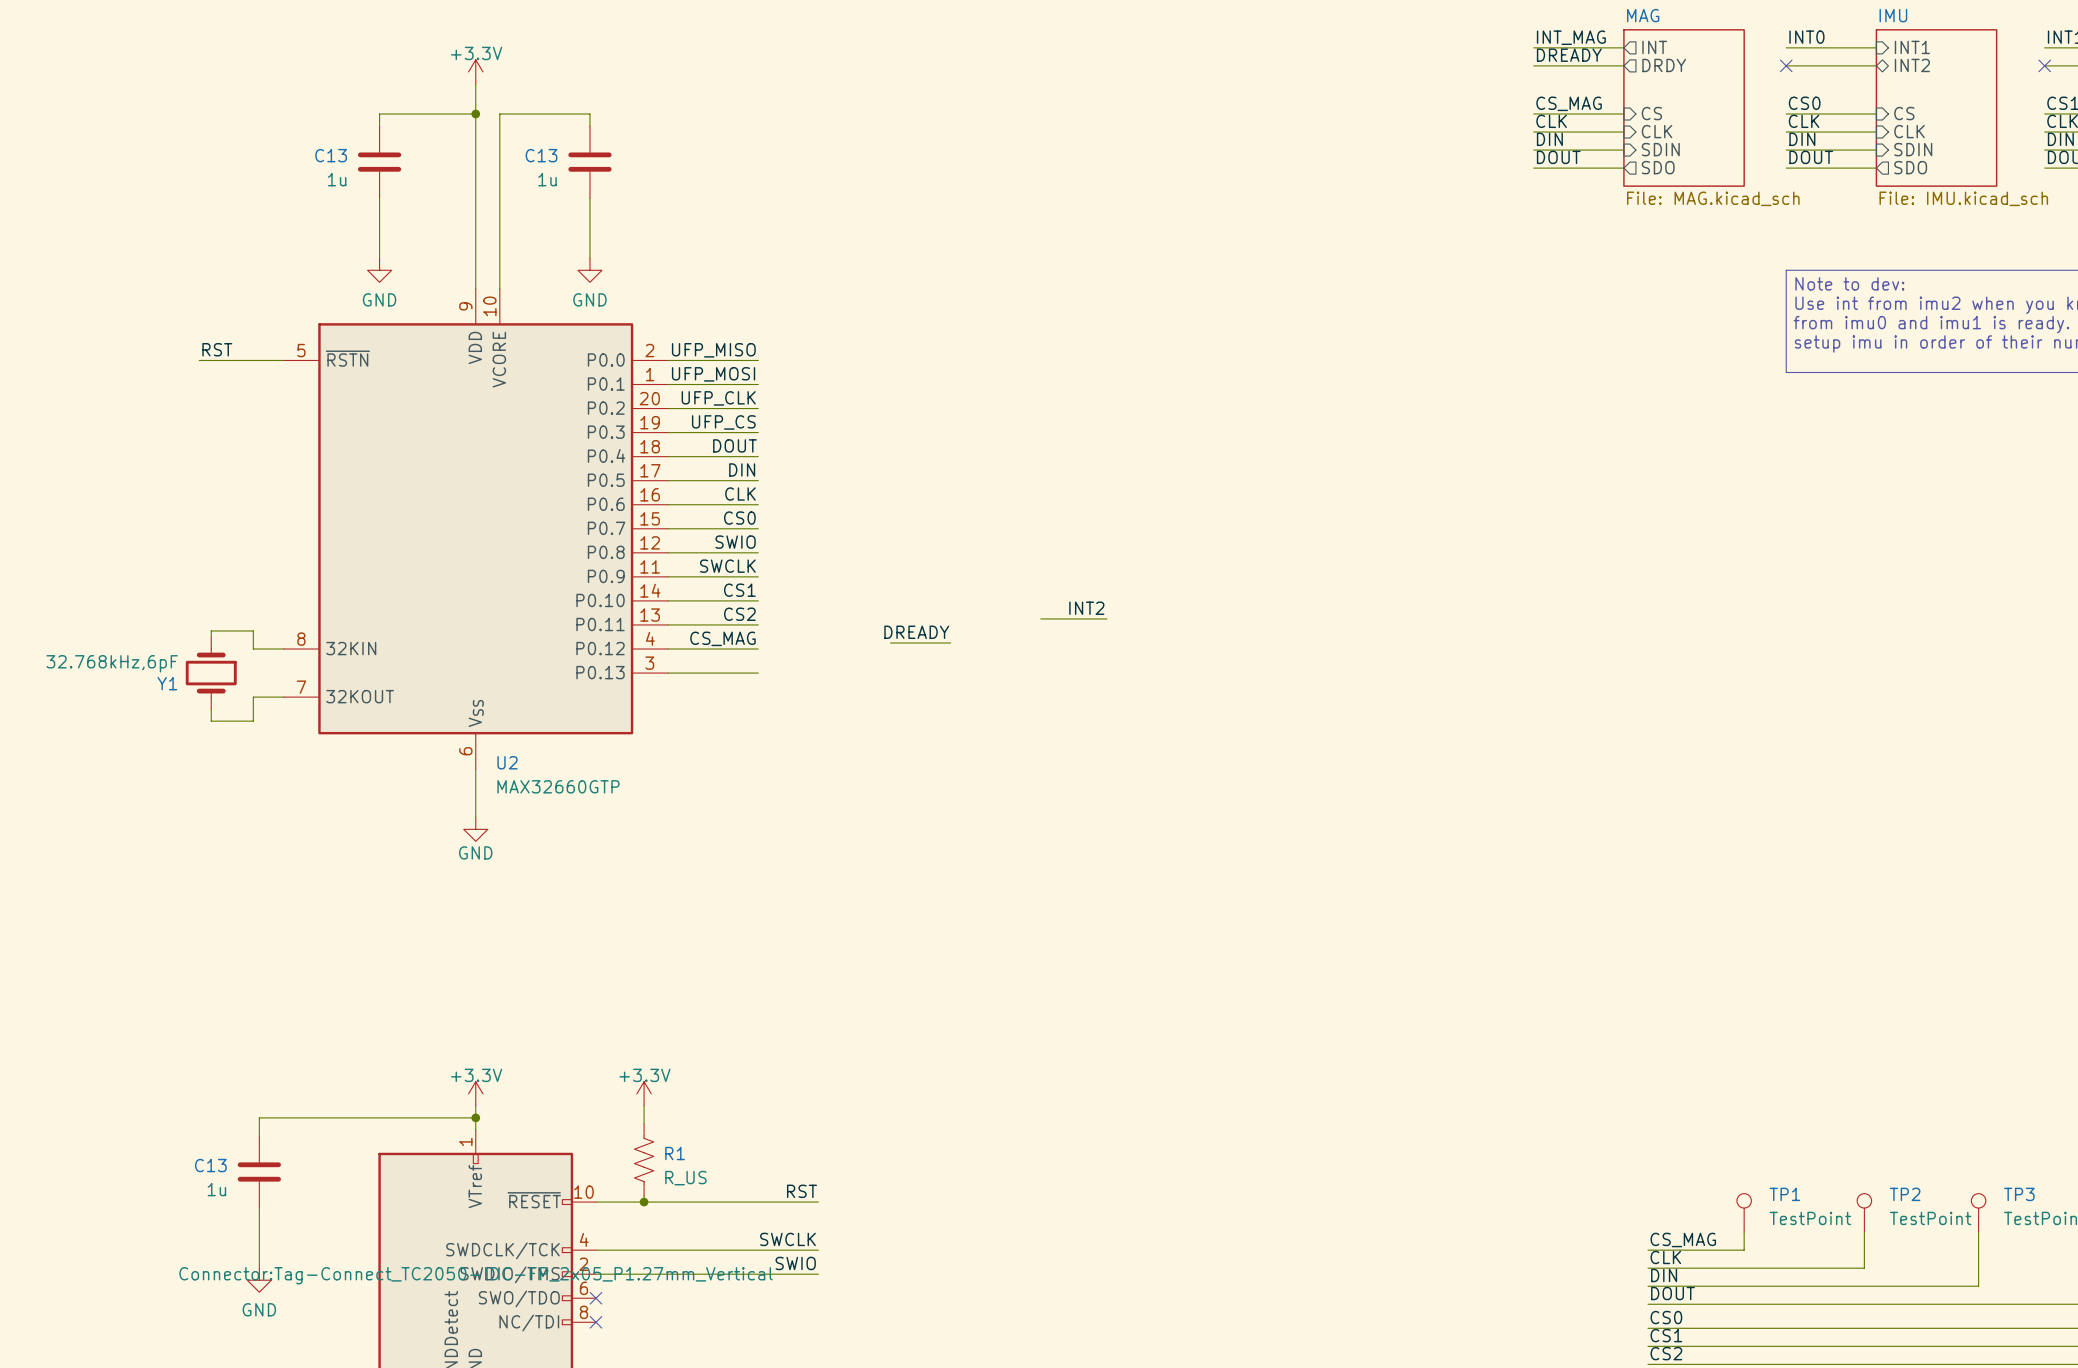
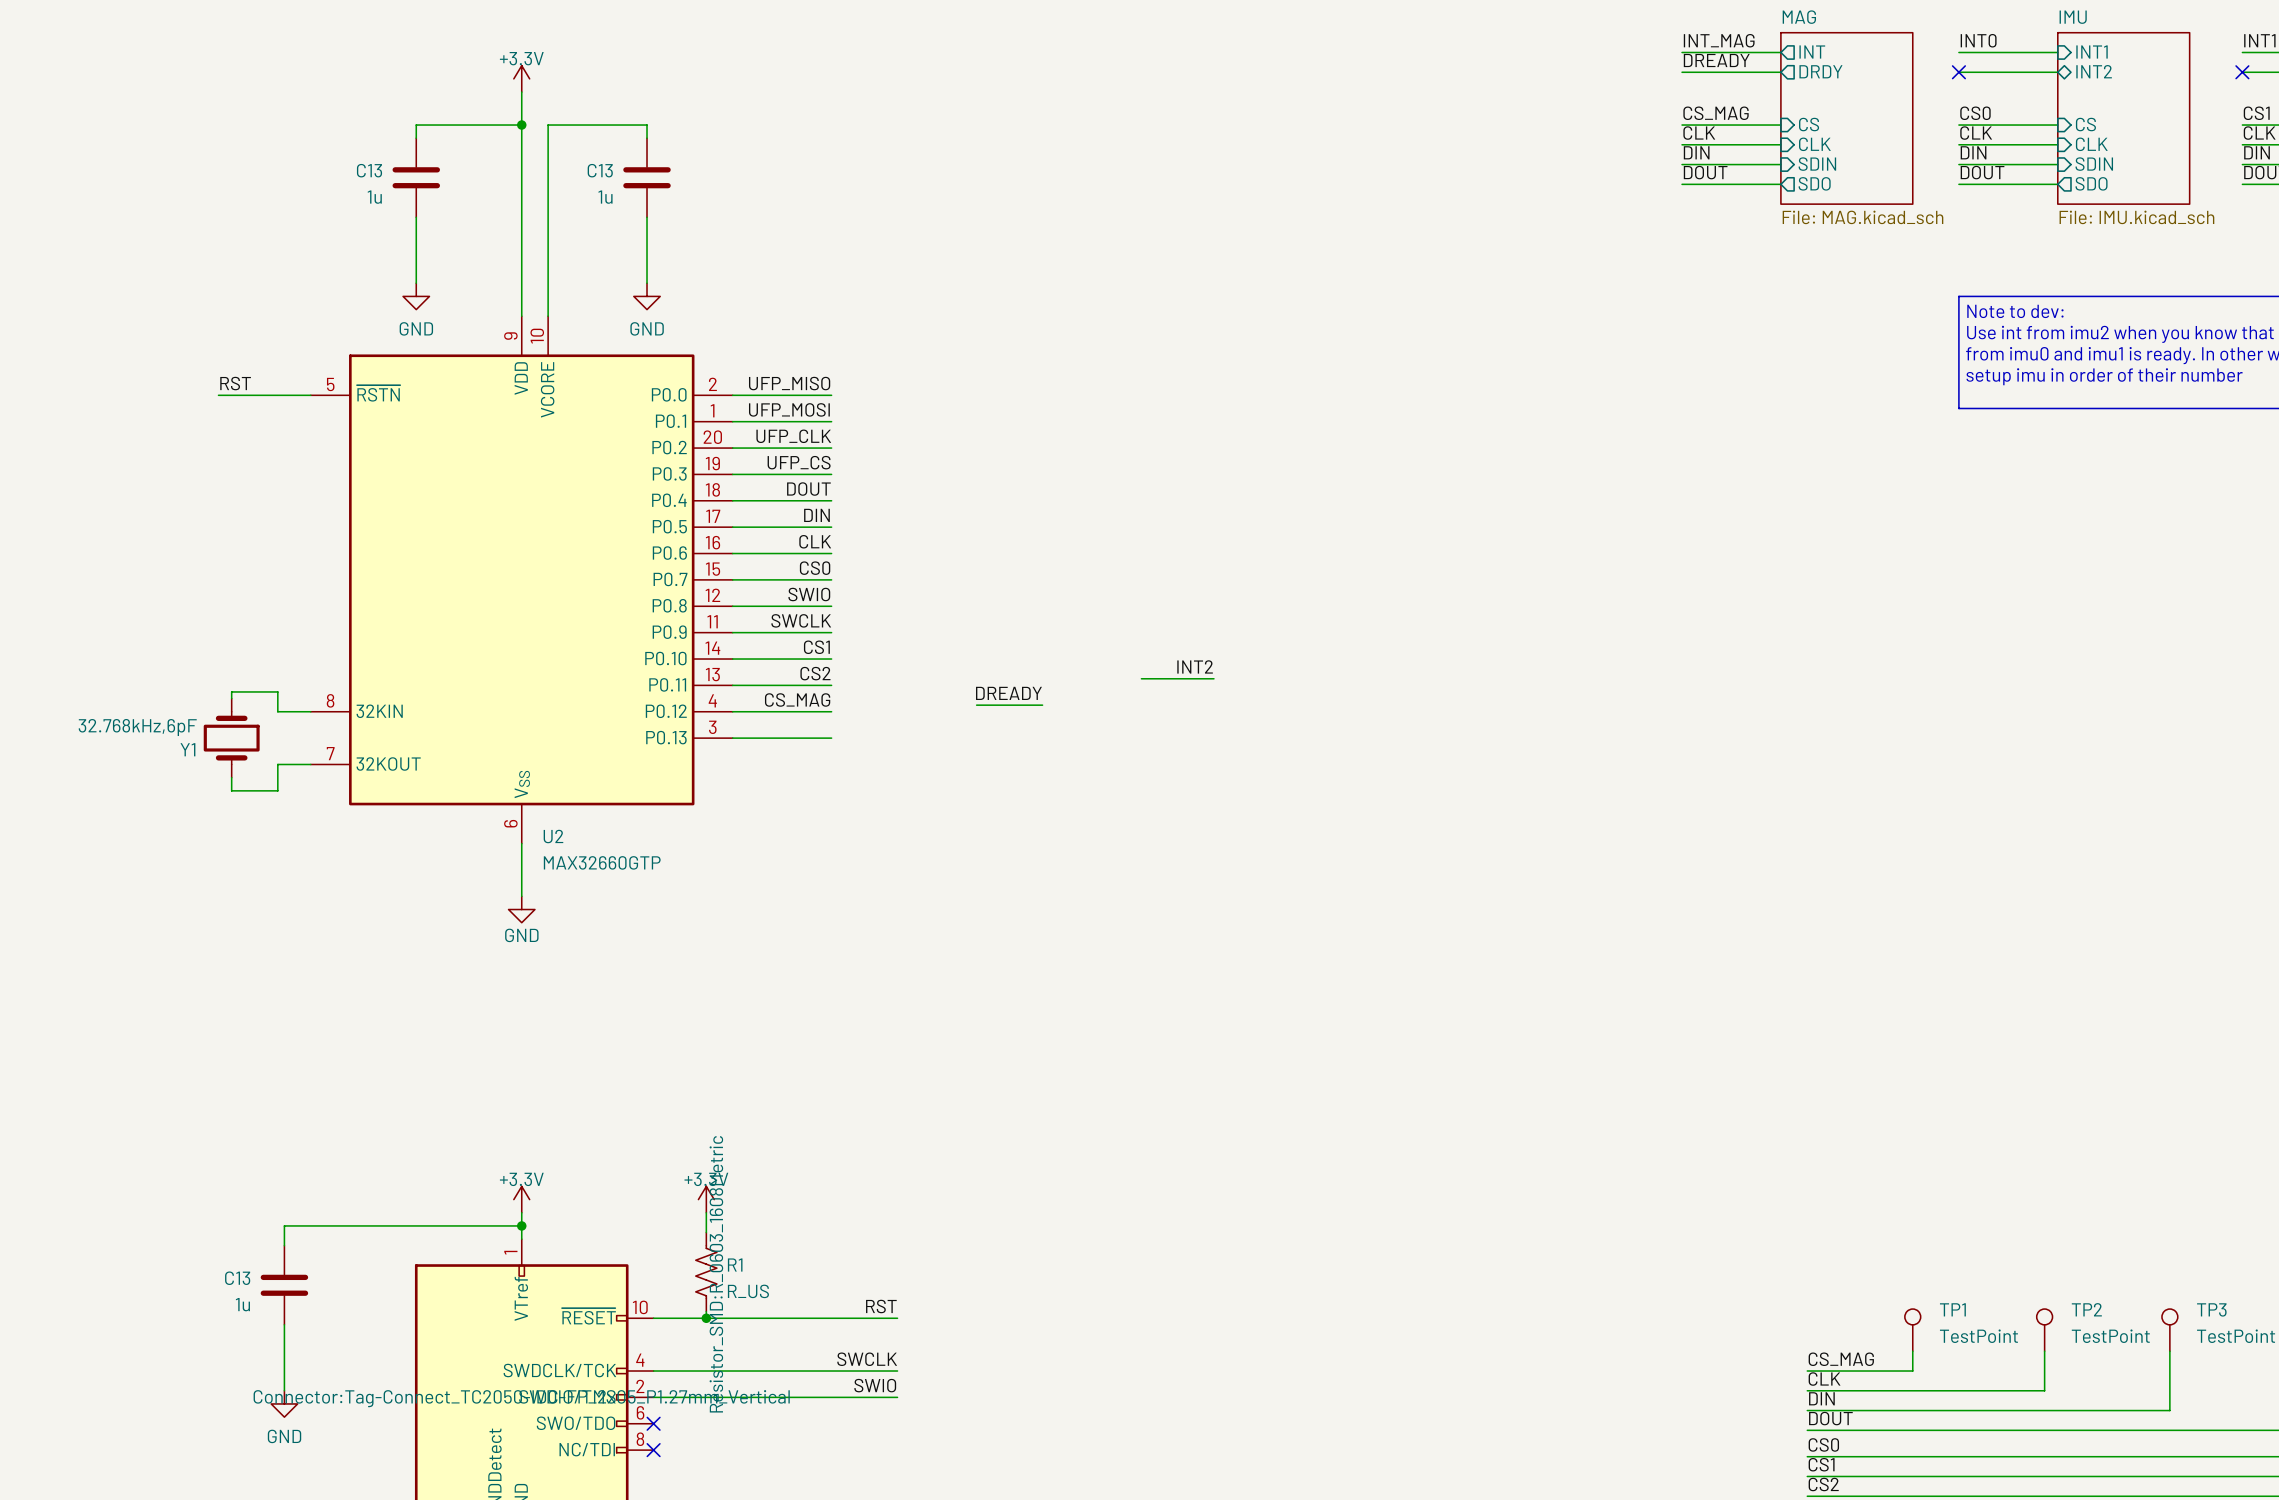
R1 text: none -> Resistor_SMD:R_0603_1608Metric (716, 1274)

